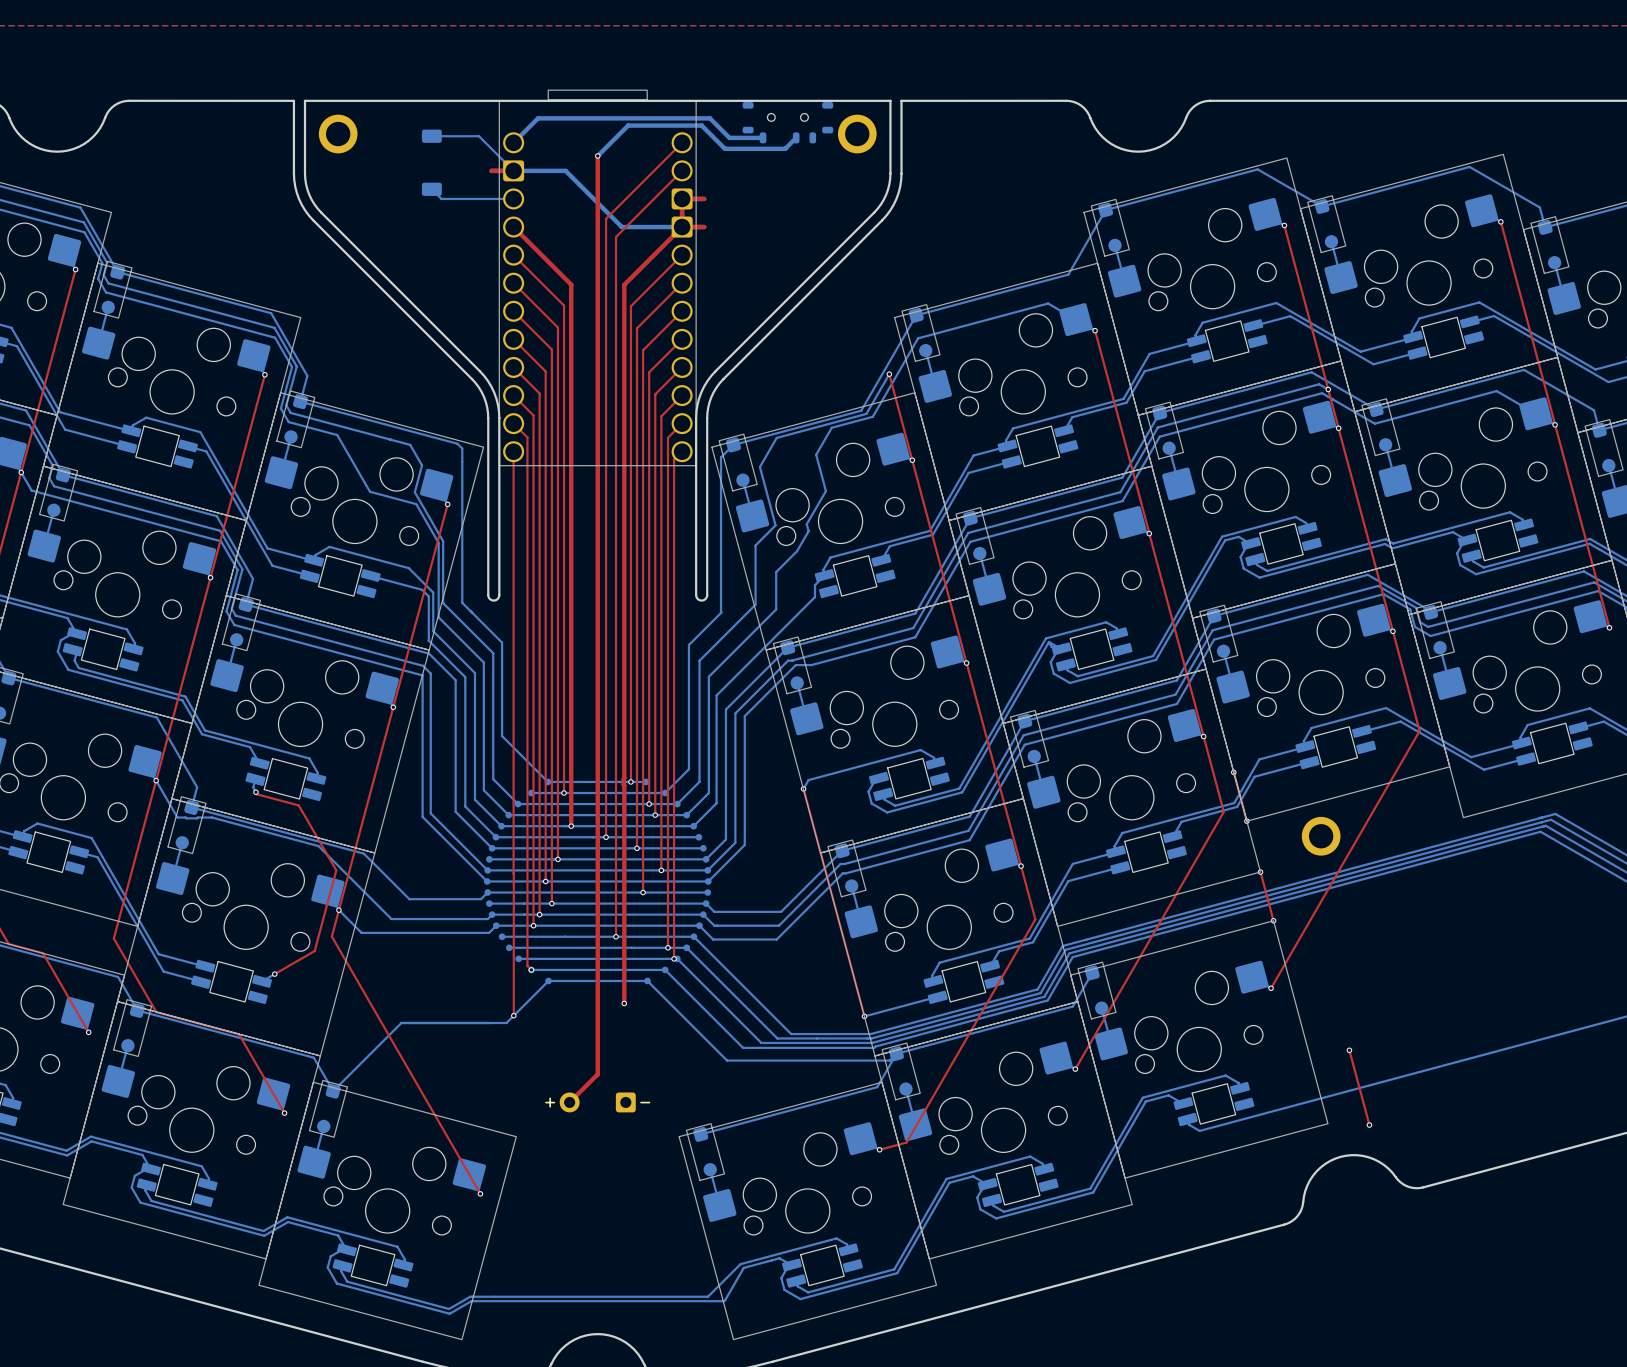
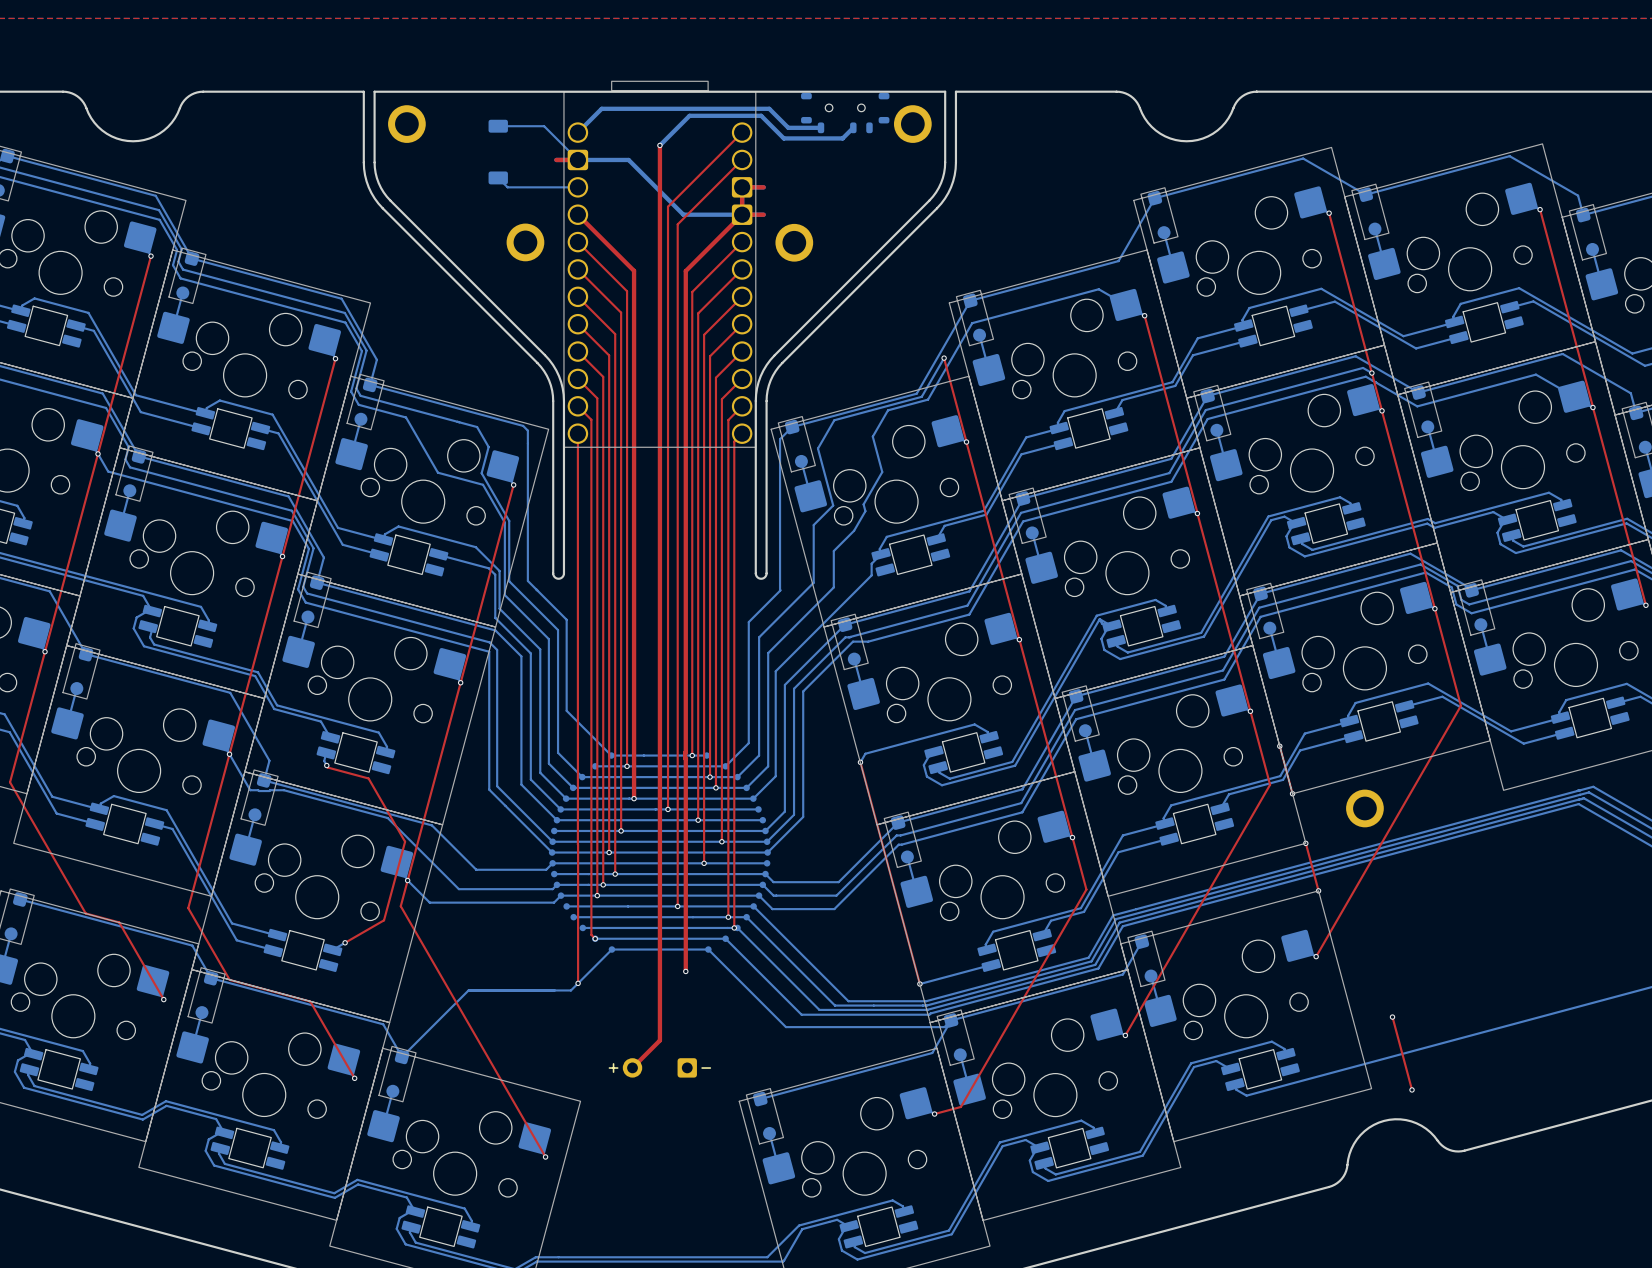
part: none -> (525, 242)
part: none -> (794, 242)

